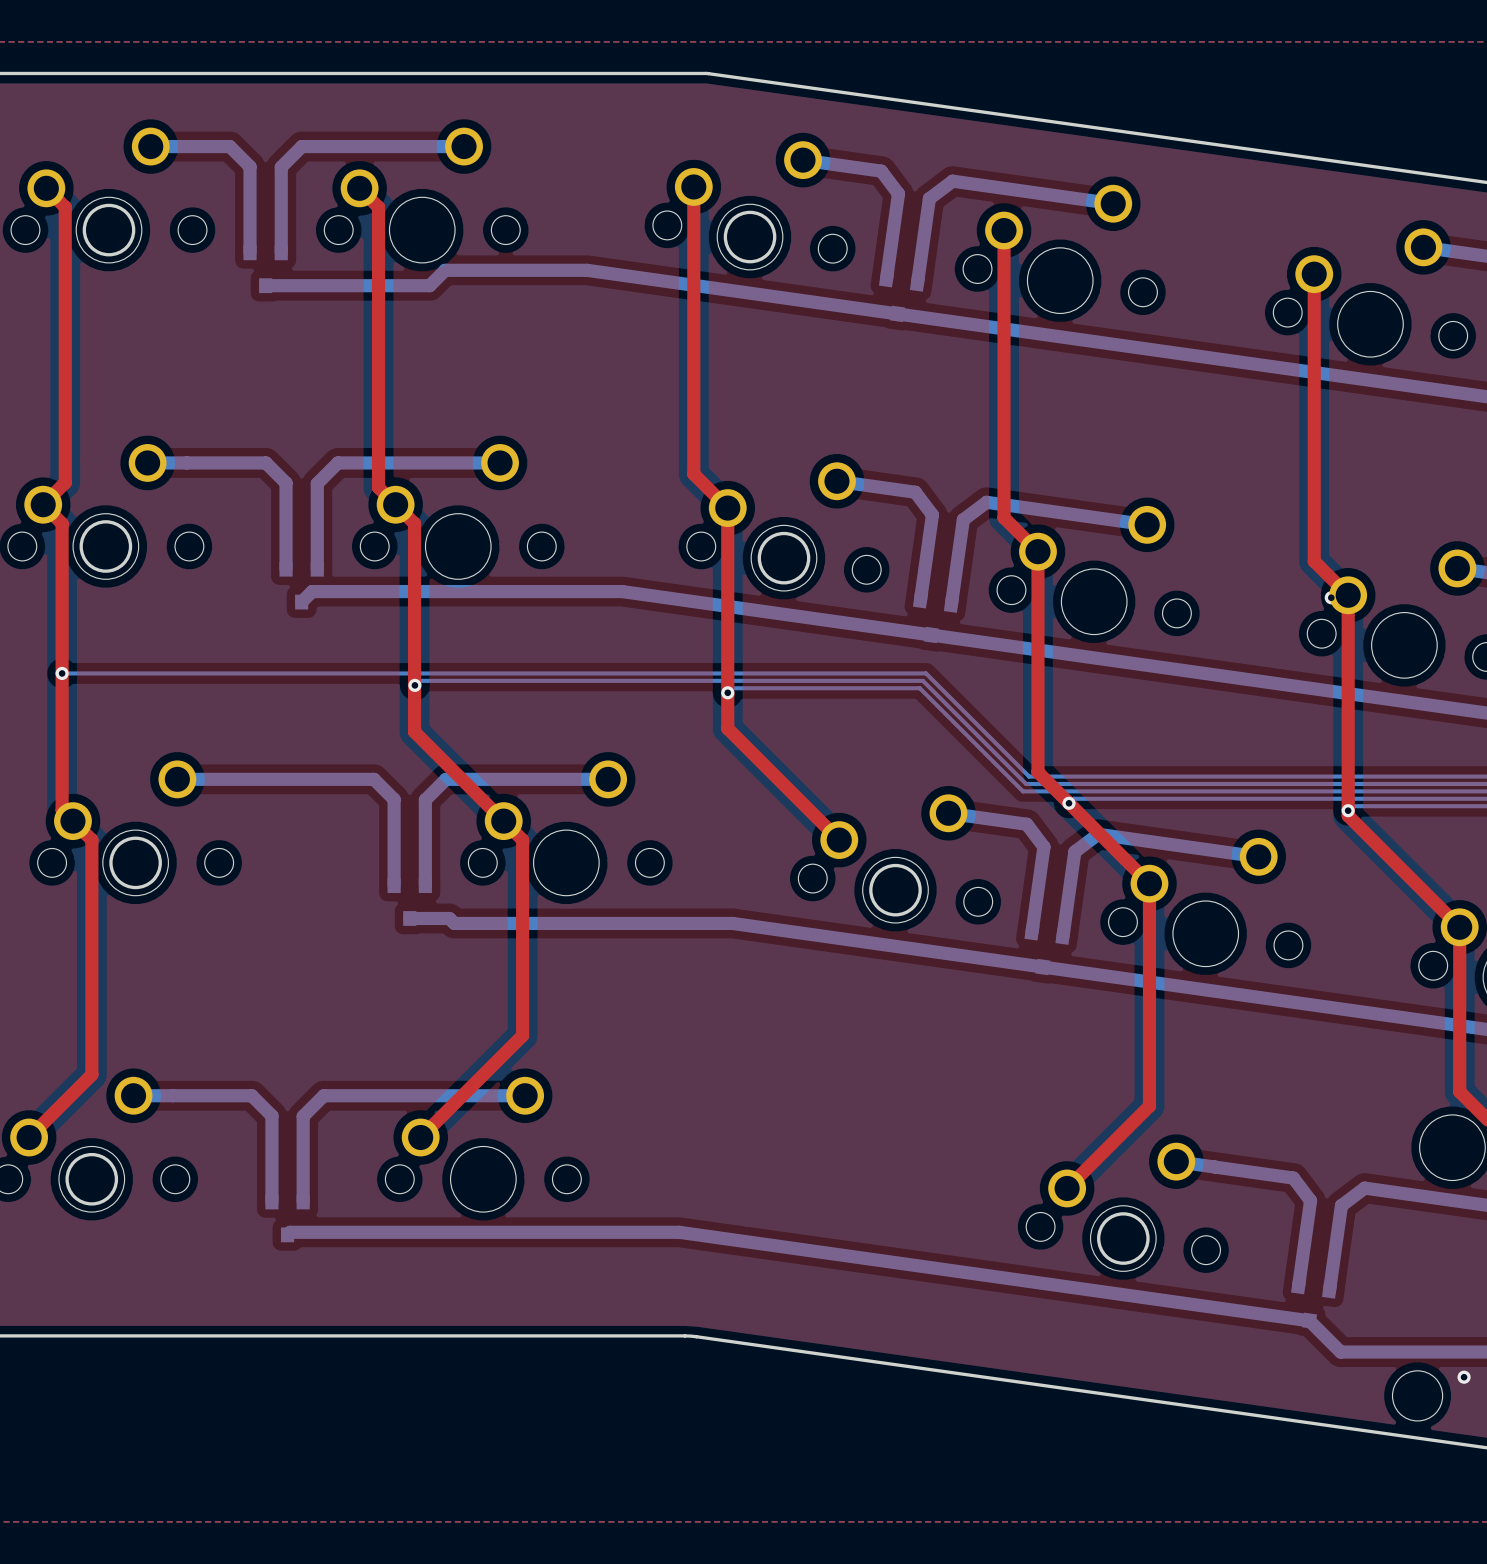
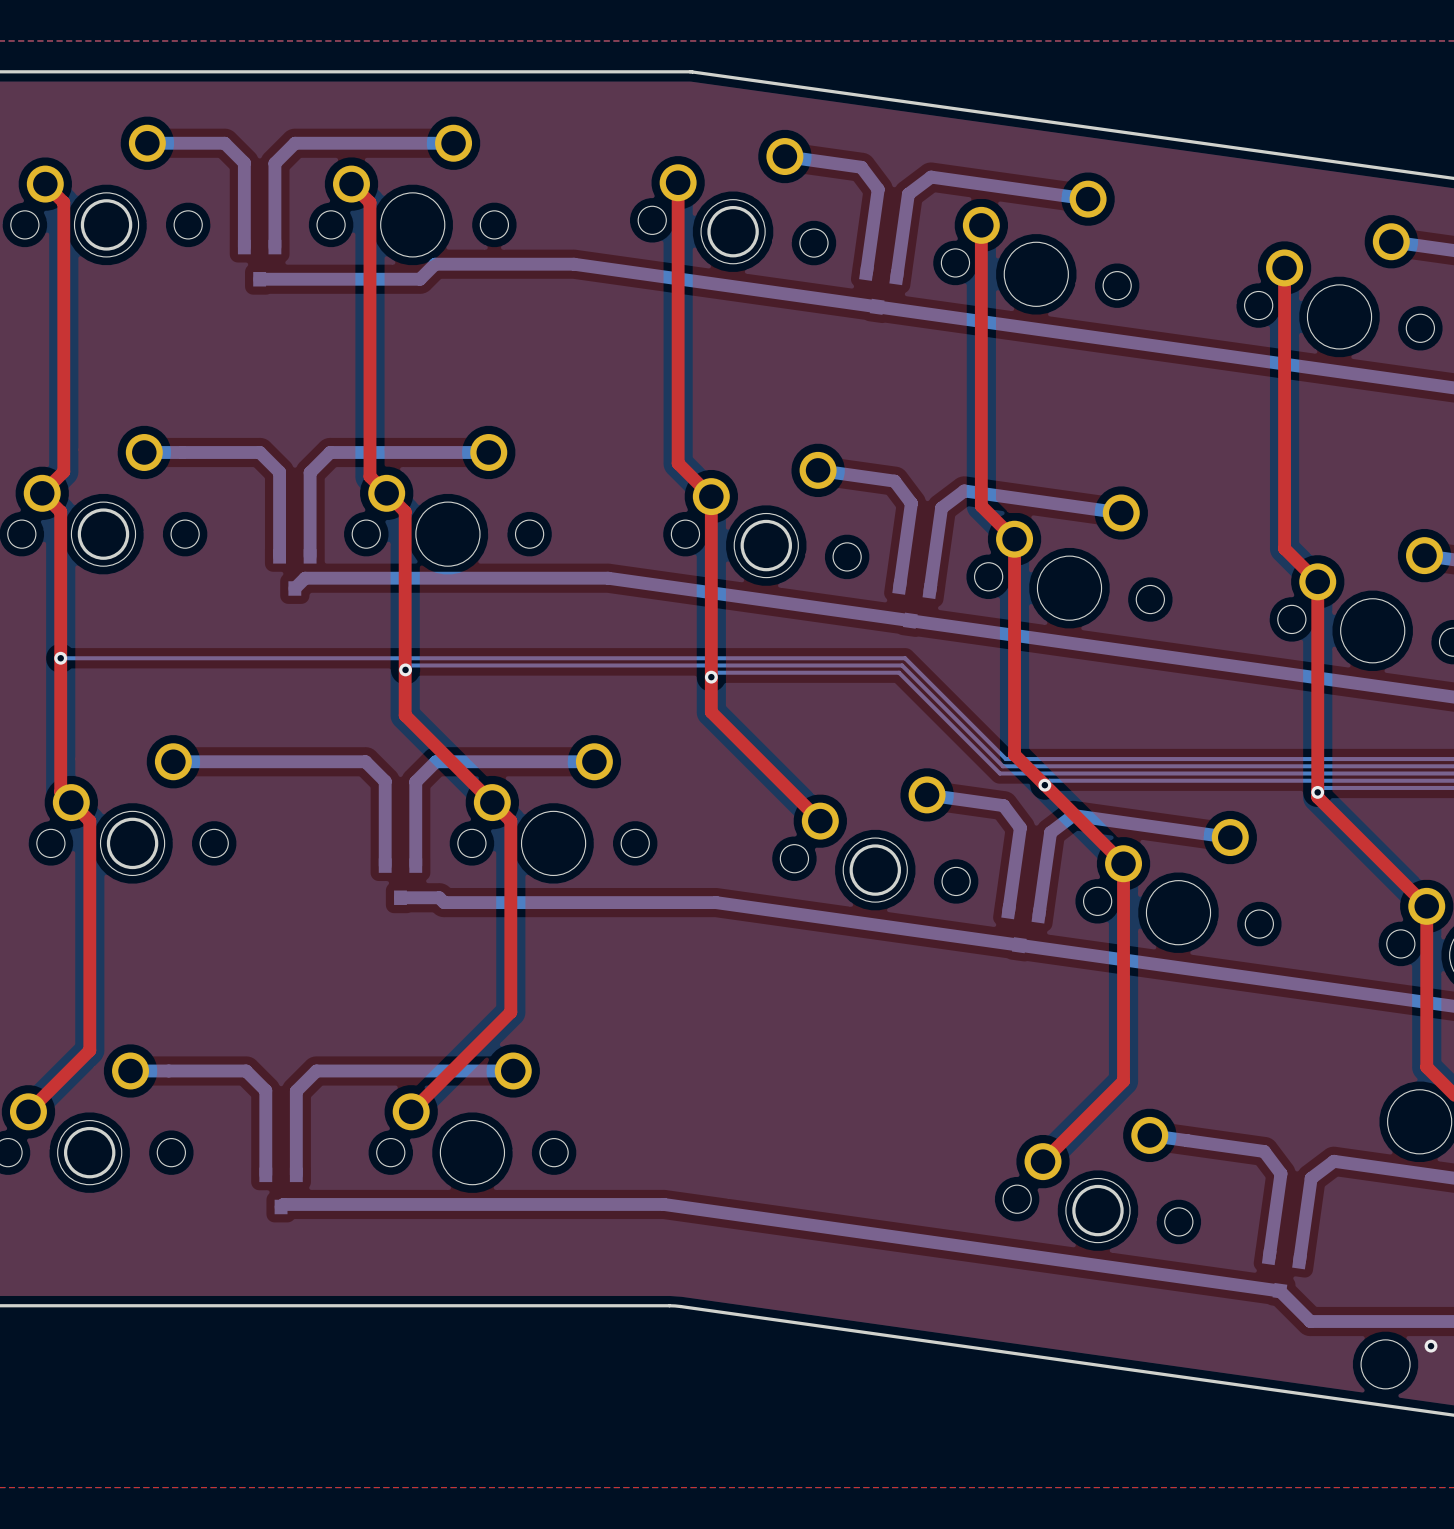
via: (1331, 597) -> none

